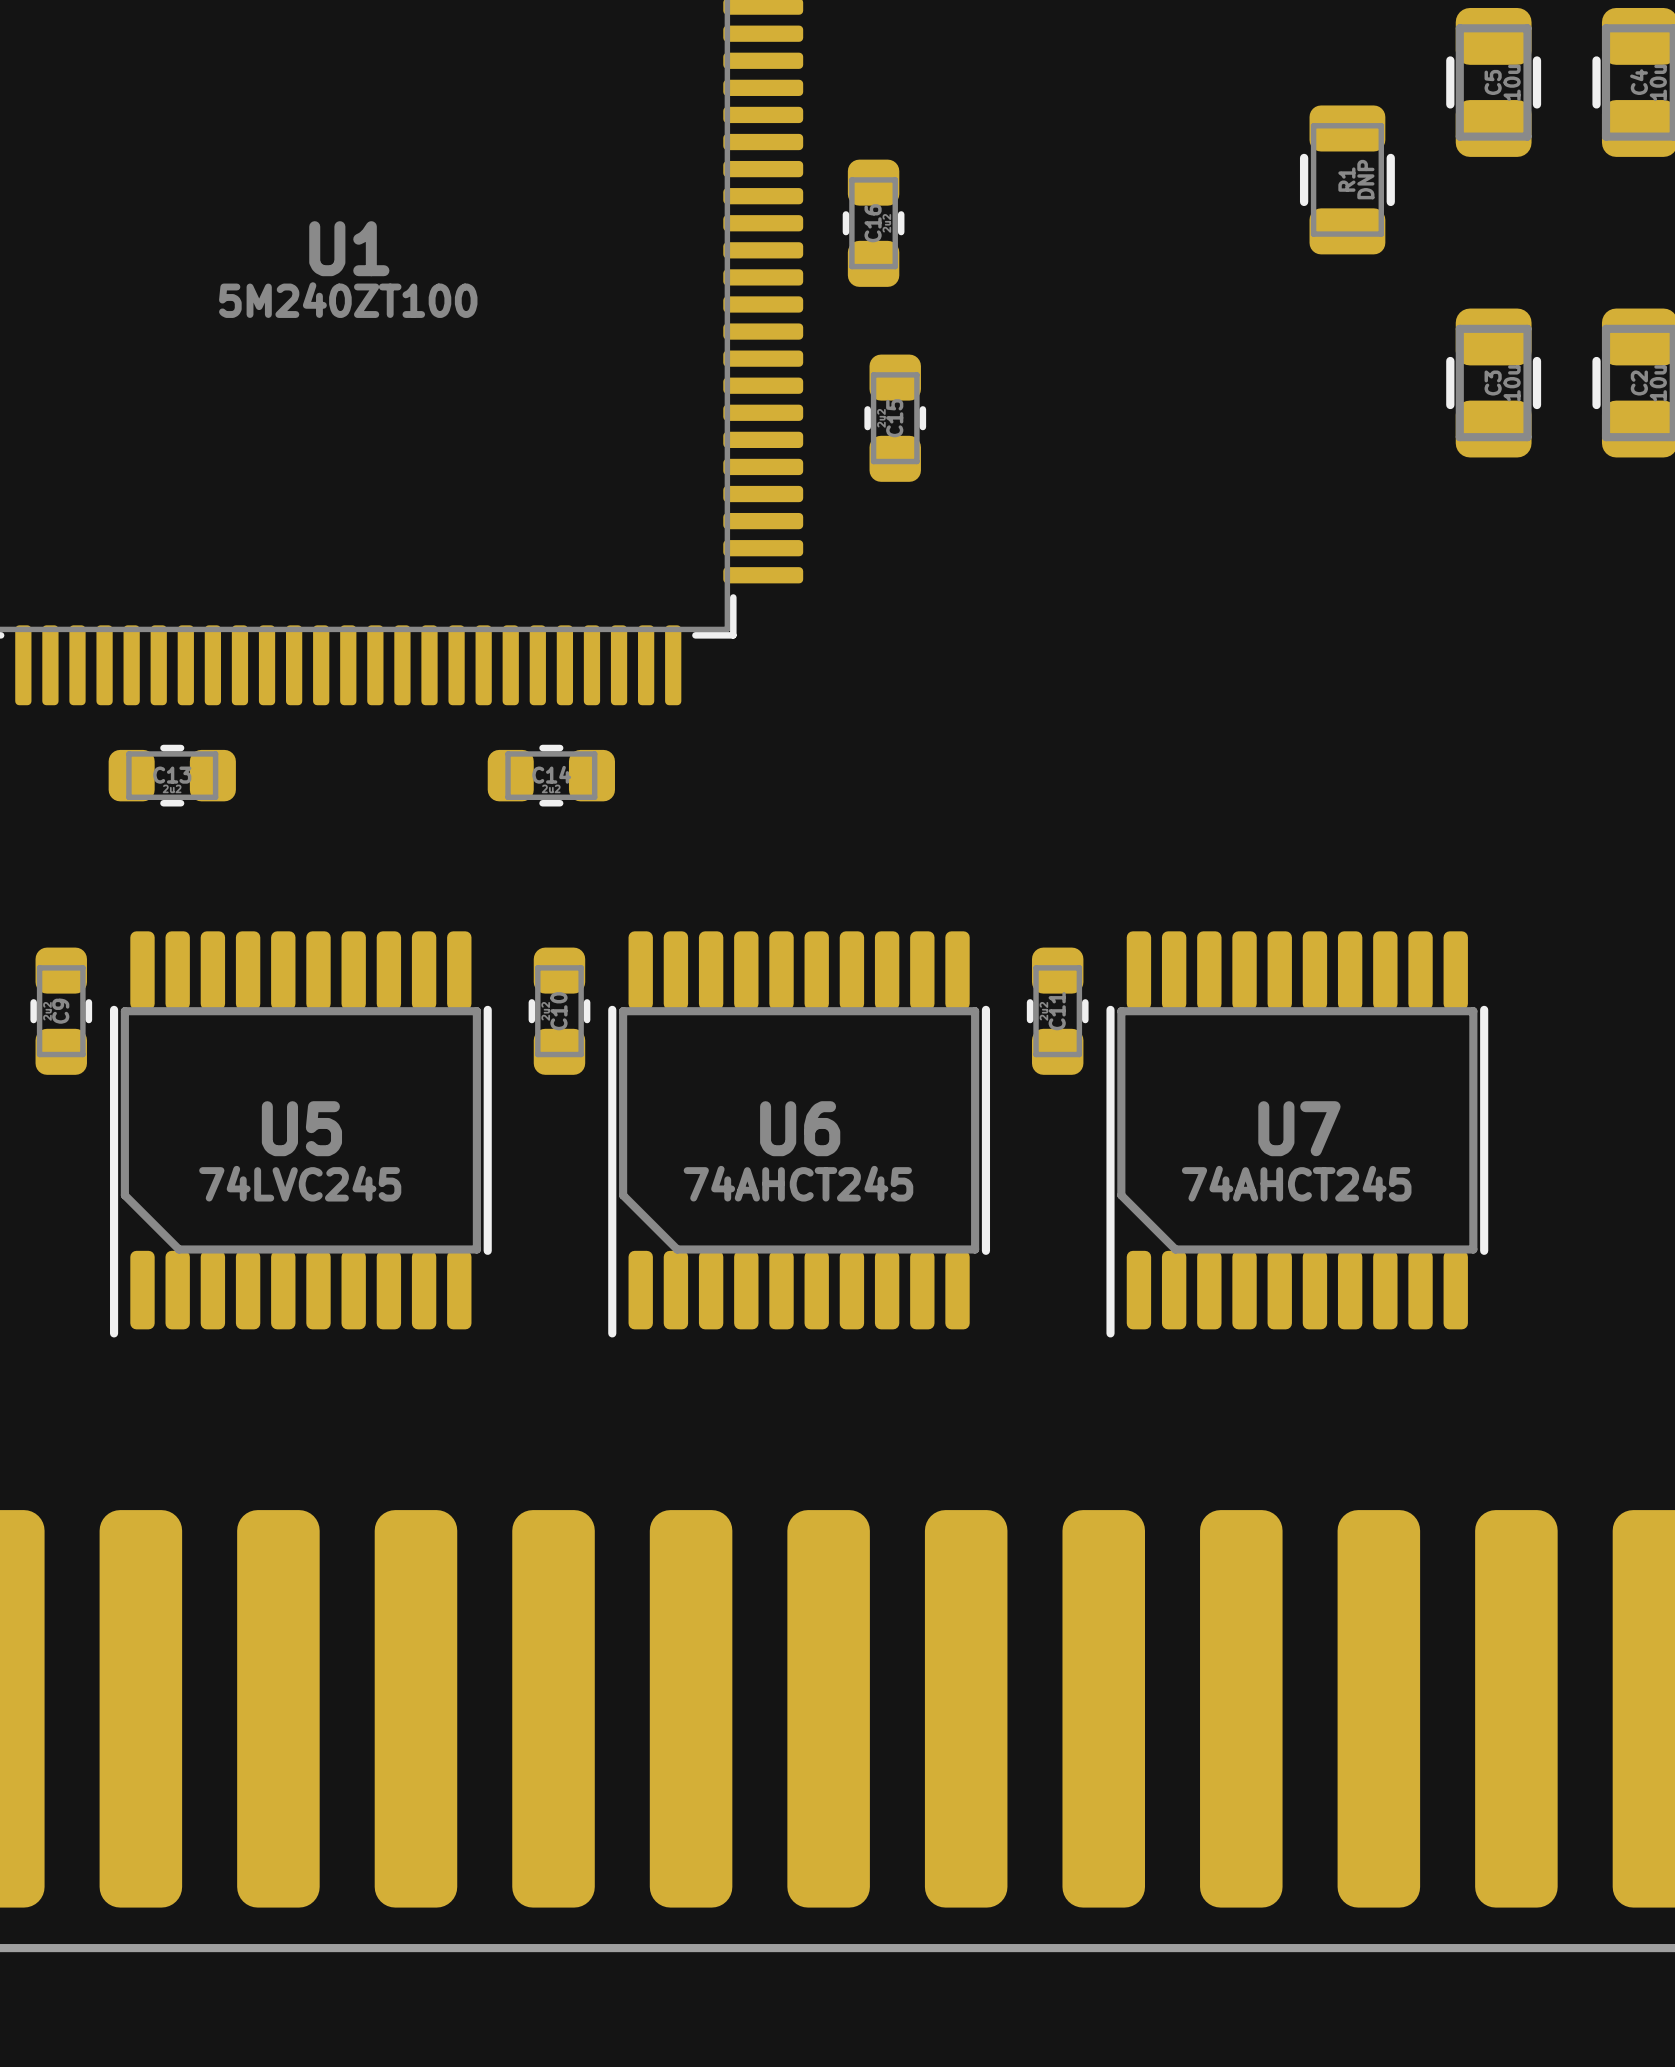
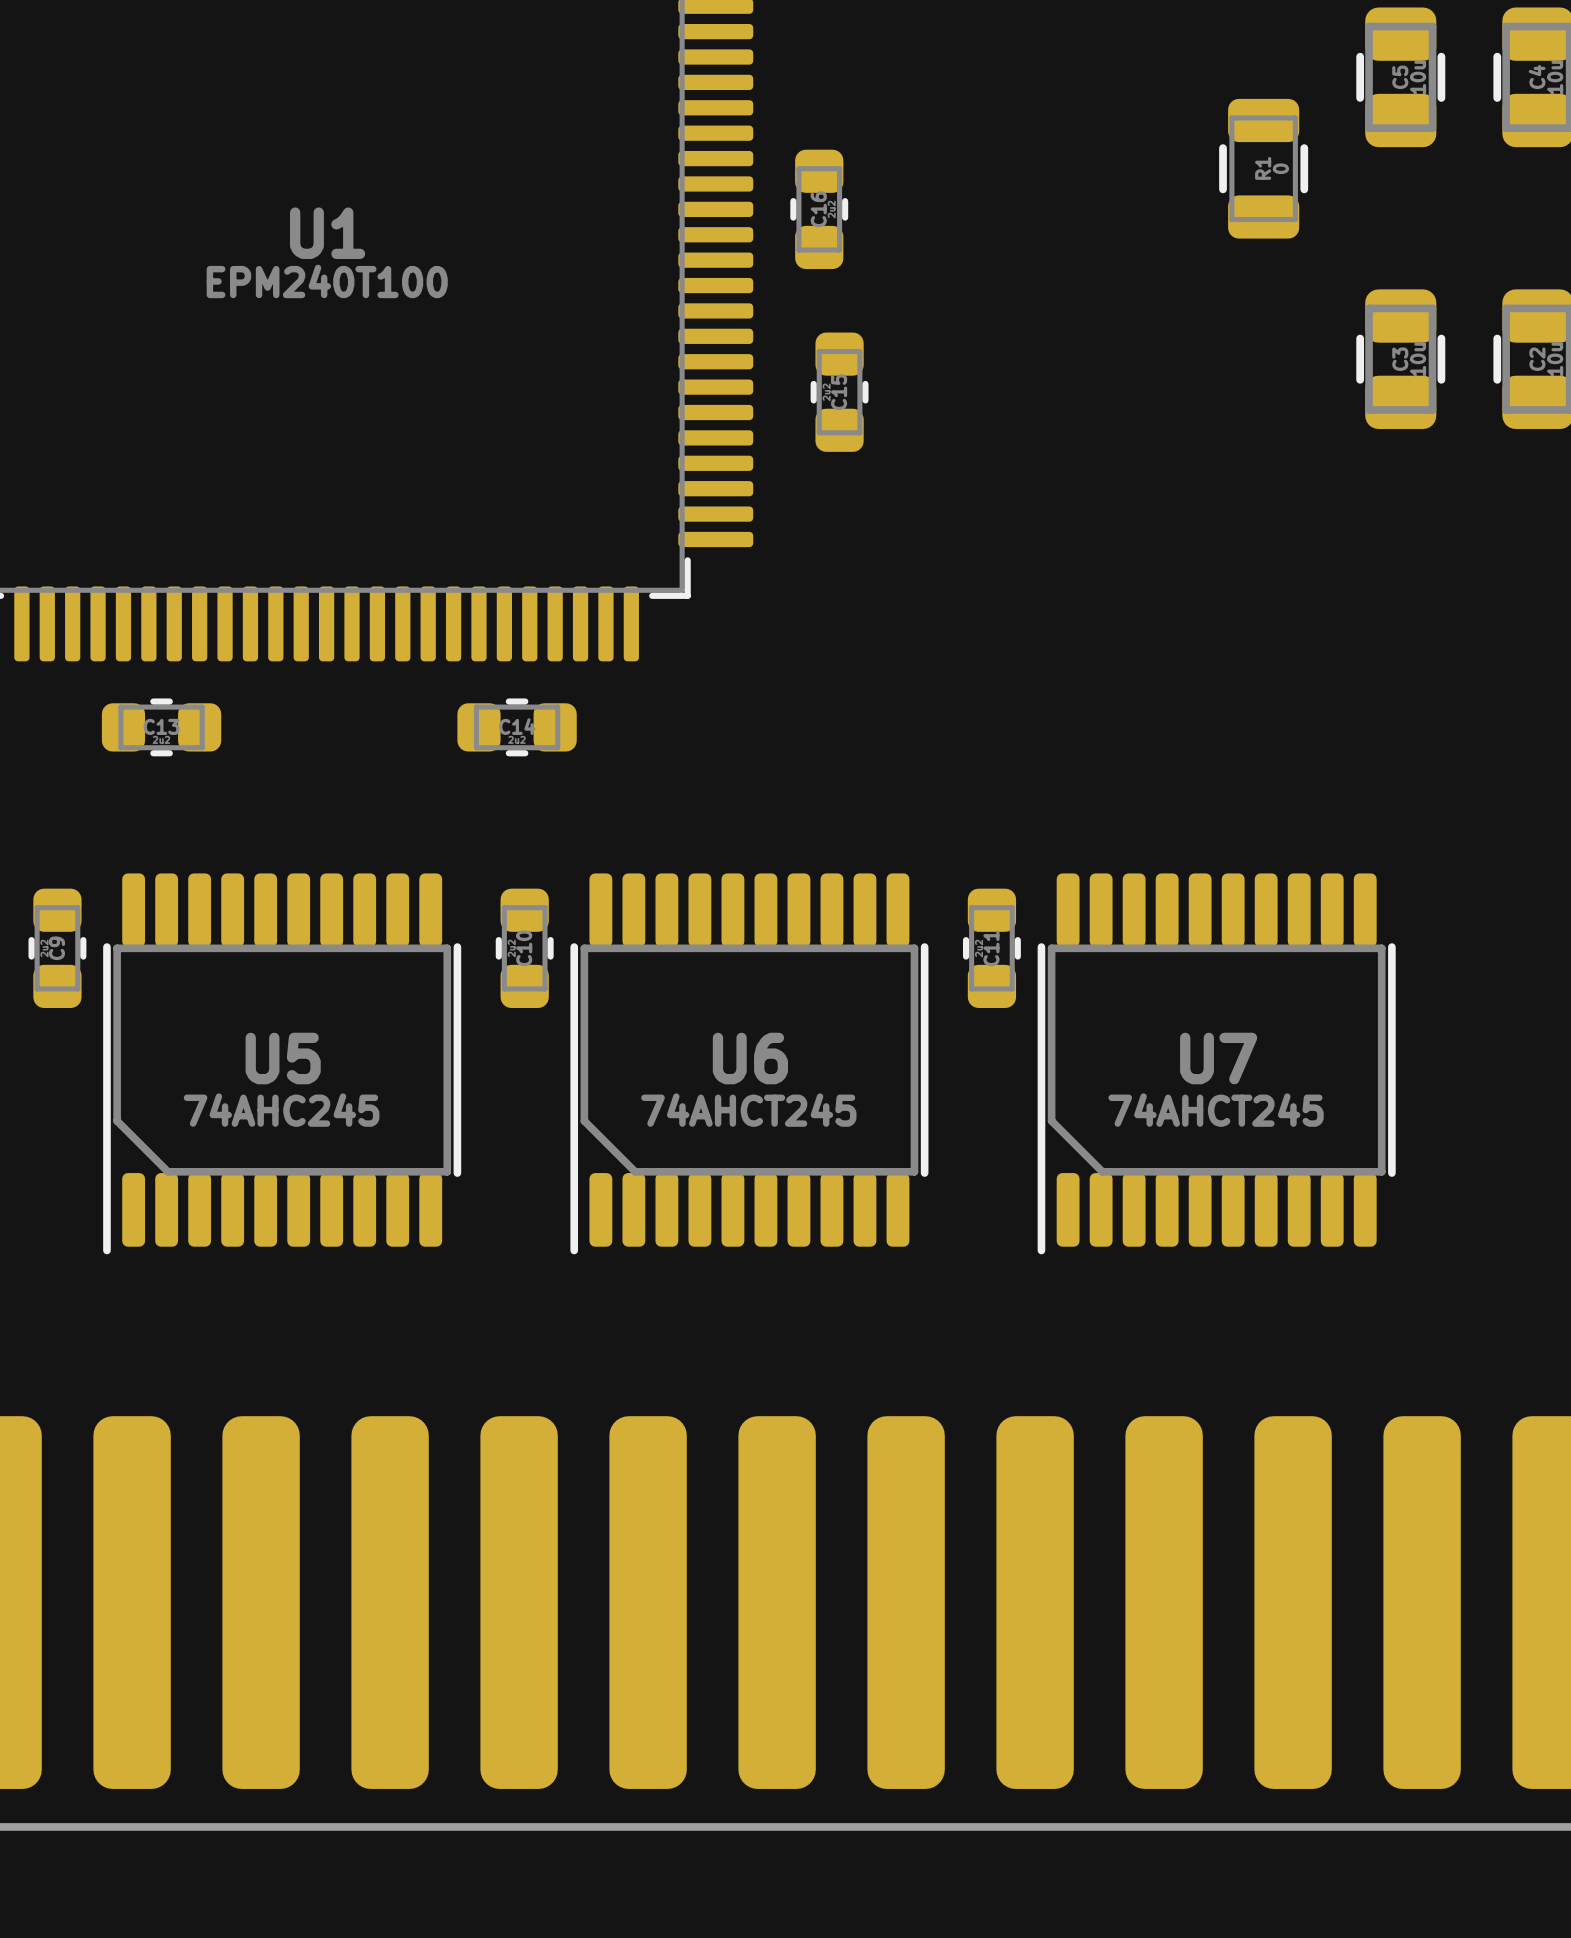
R1 value: DNP (1365, 179) -> 0 (1280, 168)
U1 value: 5M240ZT100 (348, 300) -> EPM240T100 (327, 281)
U5 value: 74LVC245 (300, 1183) -> 74AHC245 (281, 1110)

